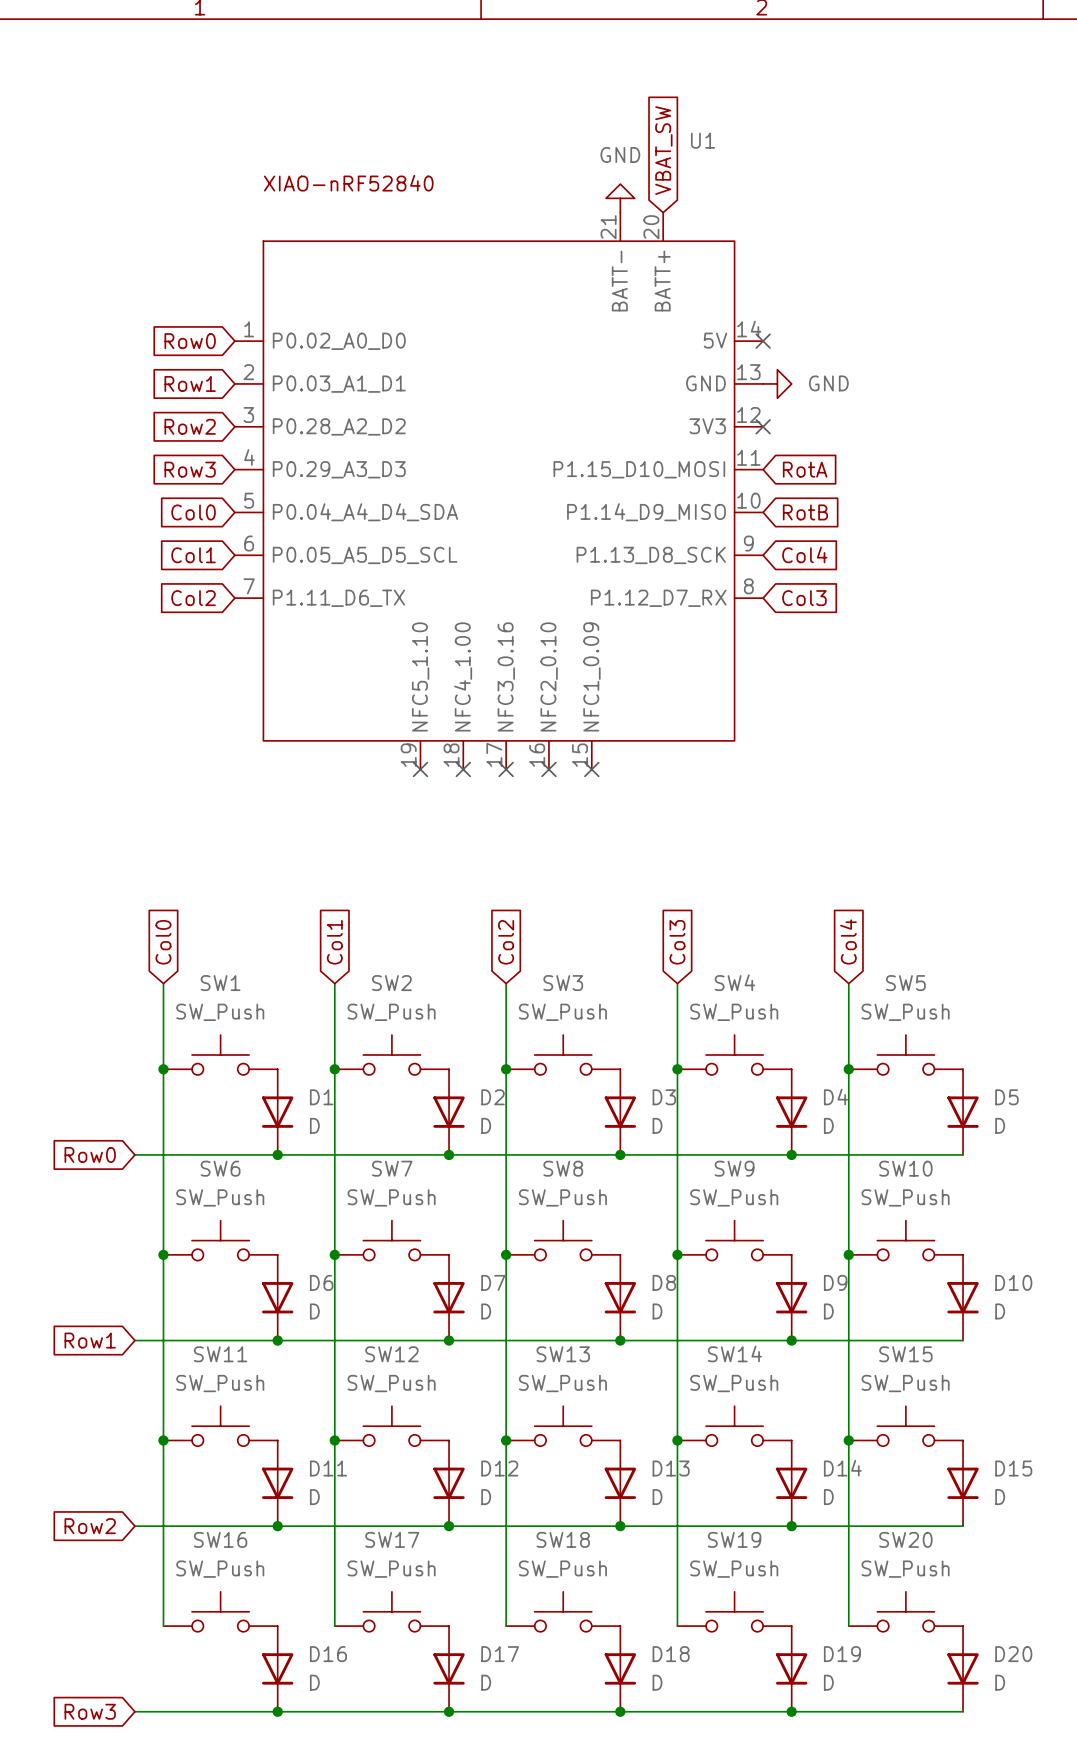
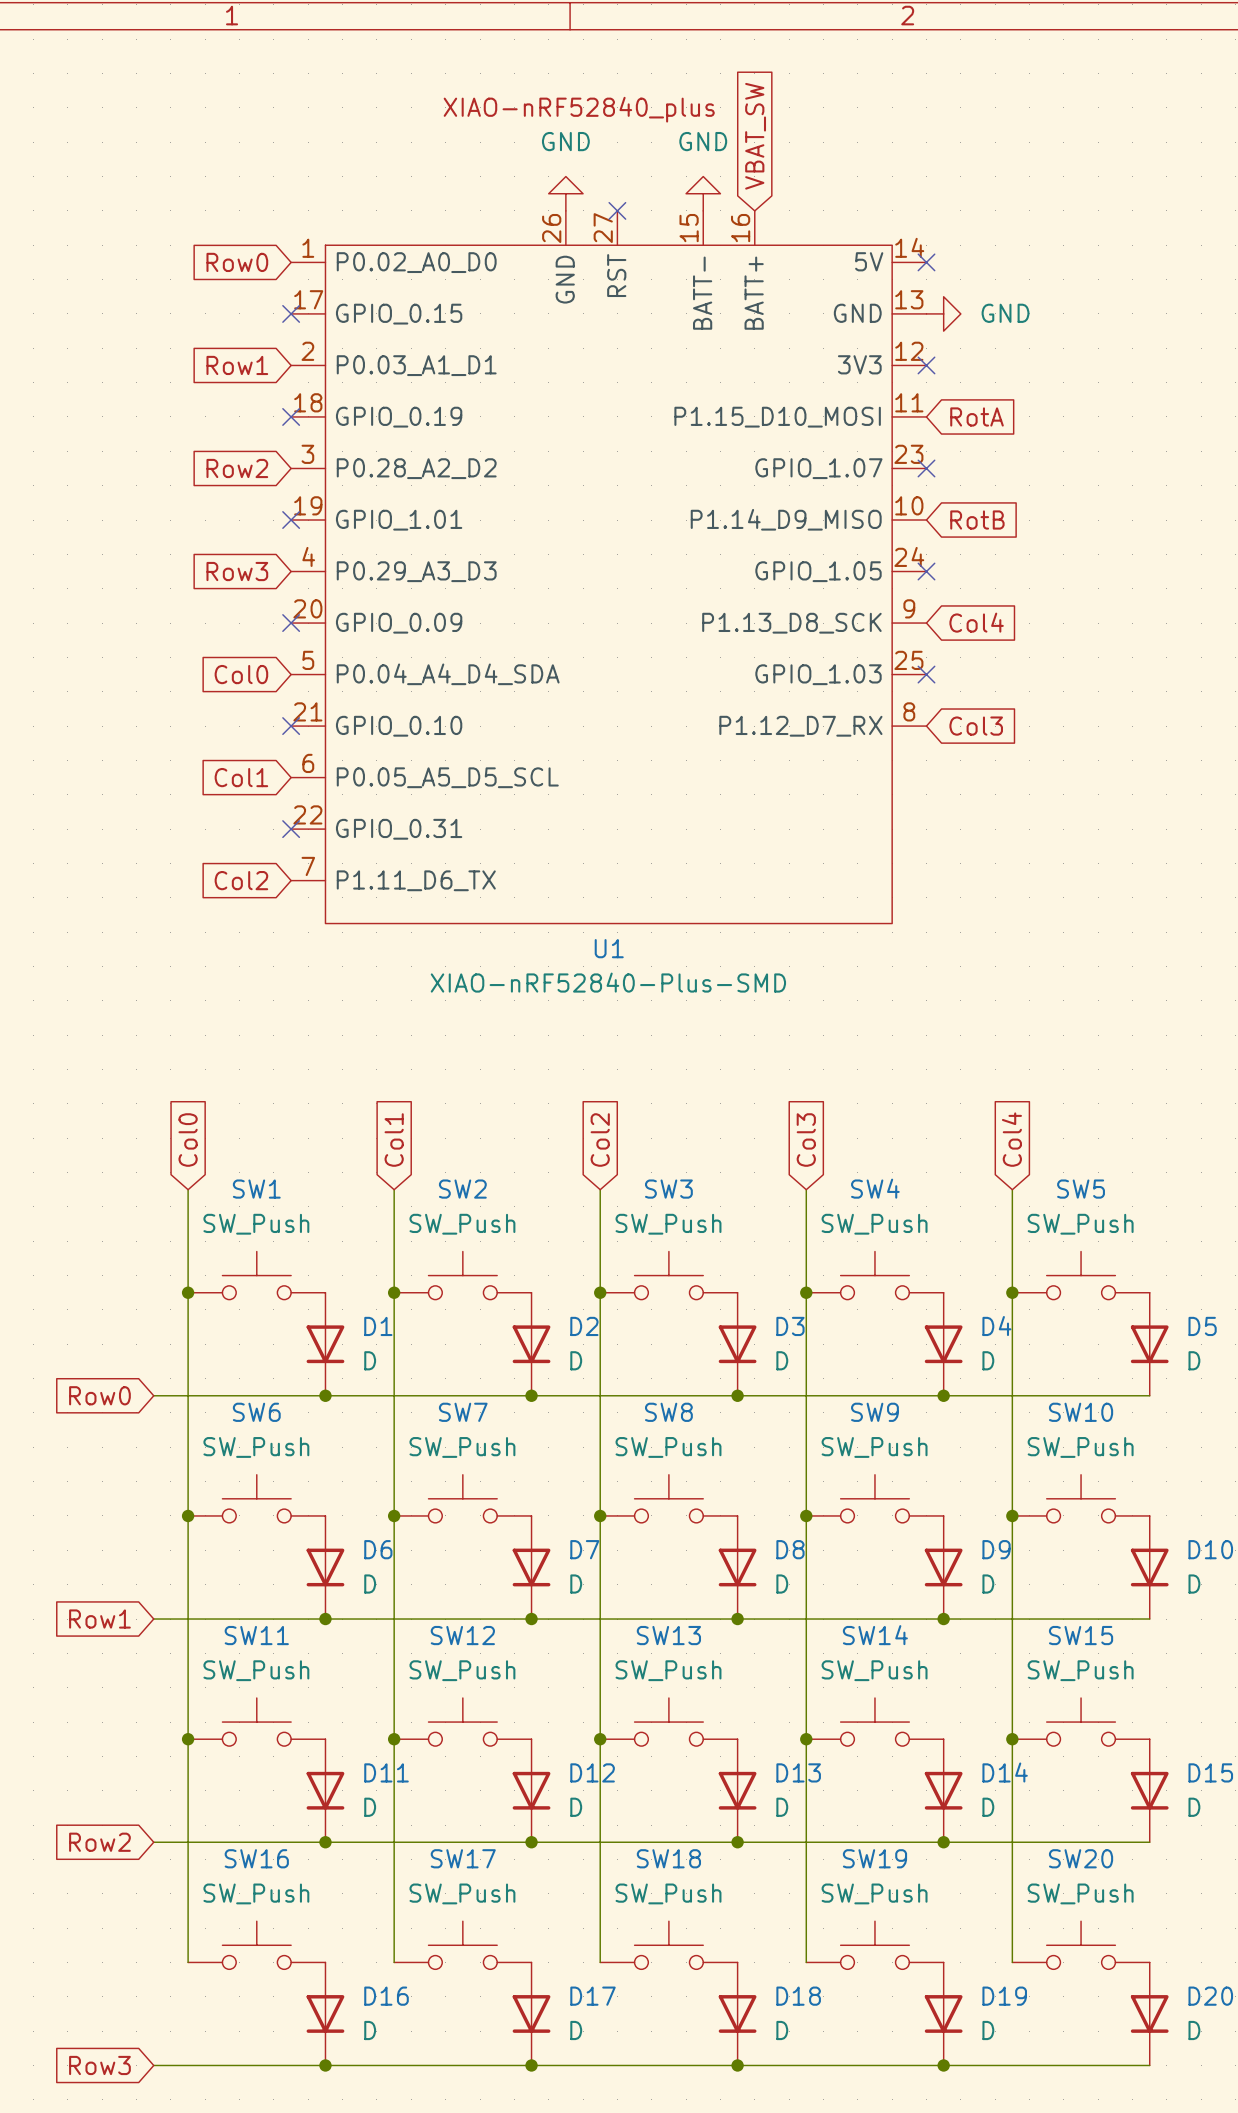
U1 name position: U1 (703, 140) -> U1 (609, 948)
global label position: VBAT_SW (663, 150) -> VBAT_SW (755, 136)
power symbol: none -> GND (565, 193)
no-connect mark: none -> (617, 210)
power symbol position: GND (620, 198) -> GND (703, 193)
U1 symbol: [234, 212, 764, 770] -> [291, 210, 927, 924]
no-connect mark: none -> (926, 262)
no-connect mark: none -> (291, 313)
power symbol: none -> GND (943, 313)
no-connect mark: none -> (926, 365)
global label position: Row0 (190, 341) -> Row0 (237, 262)
no-connect mark: none -> (291, 416)
no-connect mark: (763, 341) -> none
global label position: Row1 (190, 383) -> Row1 (237, 365)
no-connect mark: none -> (926, 468)
power symbol: GND (777, 383) -> none
global label position: Row2 (190, 426) -> Row2 (237, 468)
no-connect mark: none -> (291, 520)
no-connect mark: (763, 426) -> none
global label position: Row3 (190, 469) -> Row3 (237, 571)
no-connect mark: none -> (926, 571)
global label position: RotA (805, 469) -> RotA (977, 416)
global label position: Col0 (193, 512) -> Col0 (241, 674)
no-connect mark: none -> (291, 623)
global label position: RotB (805, 512) -> RotB (977, 520)
global label position: Col4 (804, 554) -> Col4 (976, 622)
global label position: Col1 (193, 555) -> Col1 (241, 777)
no-connect mark: none -> (926, 674)
global label position: Col2 (193, 598) -> Col2 (241, 880)
no-connect mark: none -> (291, 726)
global label position: Col3 (804, 598) -> Col3 (976, 726)
no-connect mark: none -> (291, 829)
no-connect mark: (420, 769) -> none
no-connect mark: (463, 769) -> none
no-connect mark: (506, 769) -> none
no-connect mark: (548, 769) -> none
no-connect mark: (591, 769) -> none
U1 value: none -> XIAO-nRF52840-Plus-SMD (608, 982)

